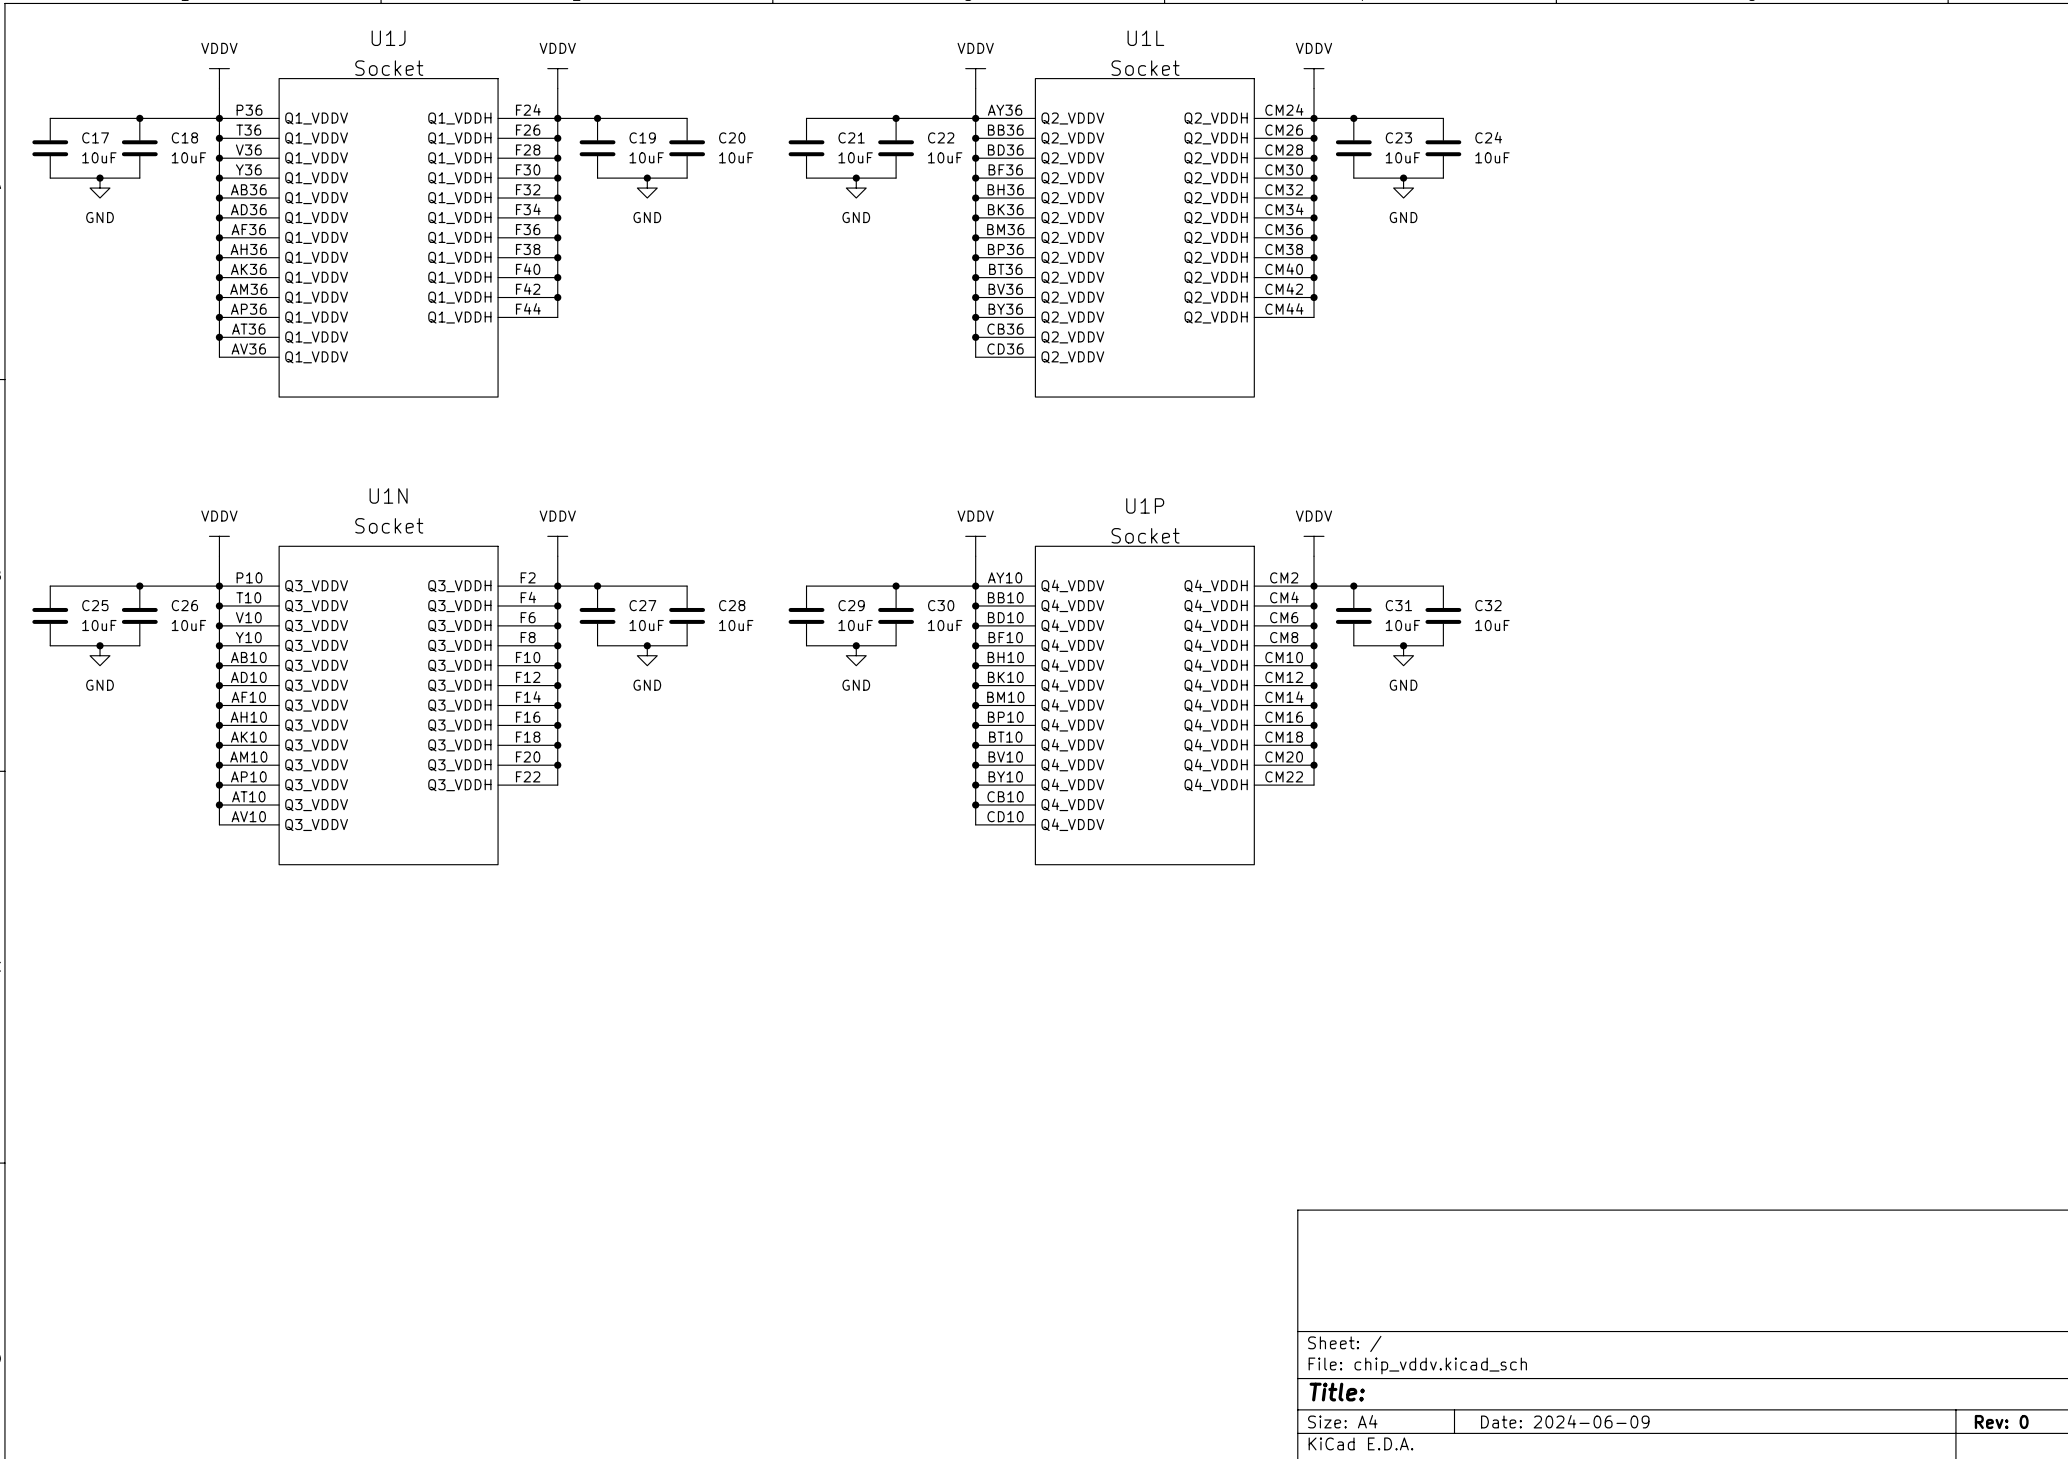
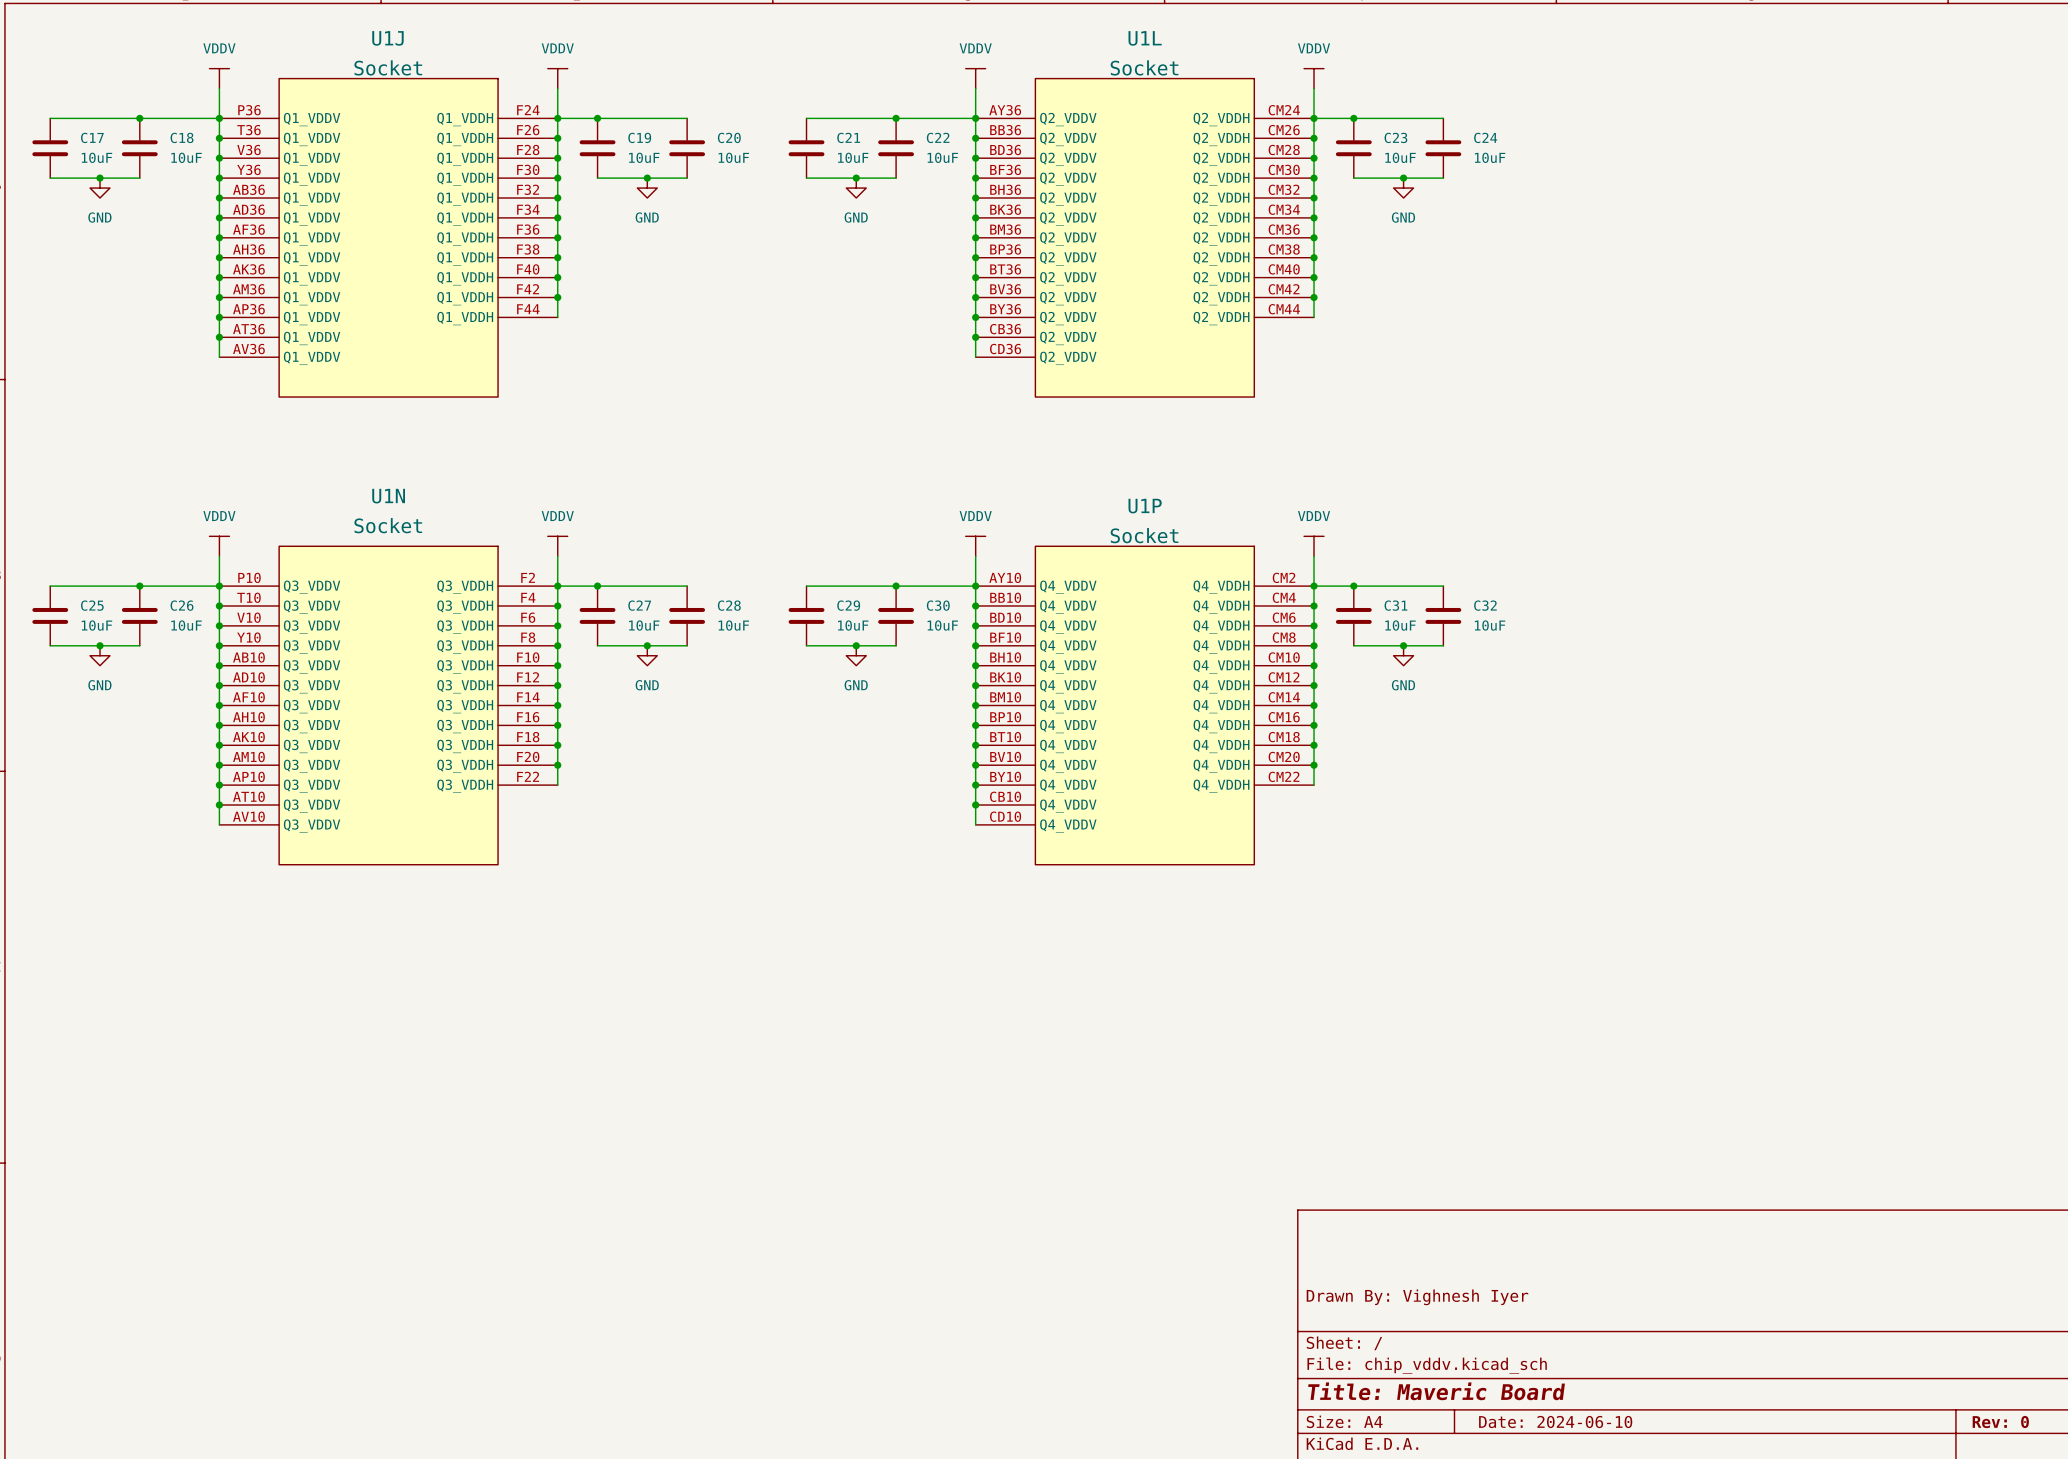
title block: none -> Drawn By: Vighnesh Iyer (1417, 1297)
title block: Title: (1337, 1392) -> Title: Maveric Board (1436, 1391)
title block: Date: 2024-06-09 (1565, 1421) -> Date: 2024-06-10 (1555, 1421)

